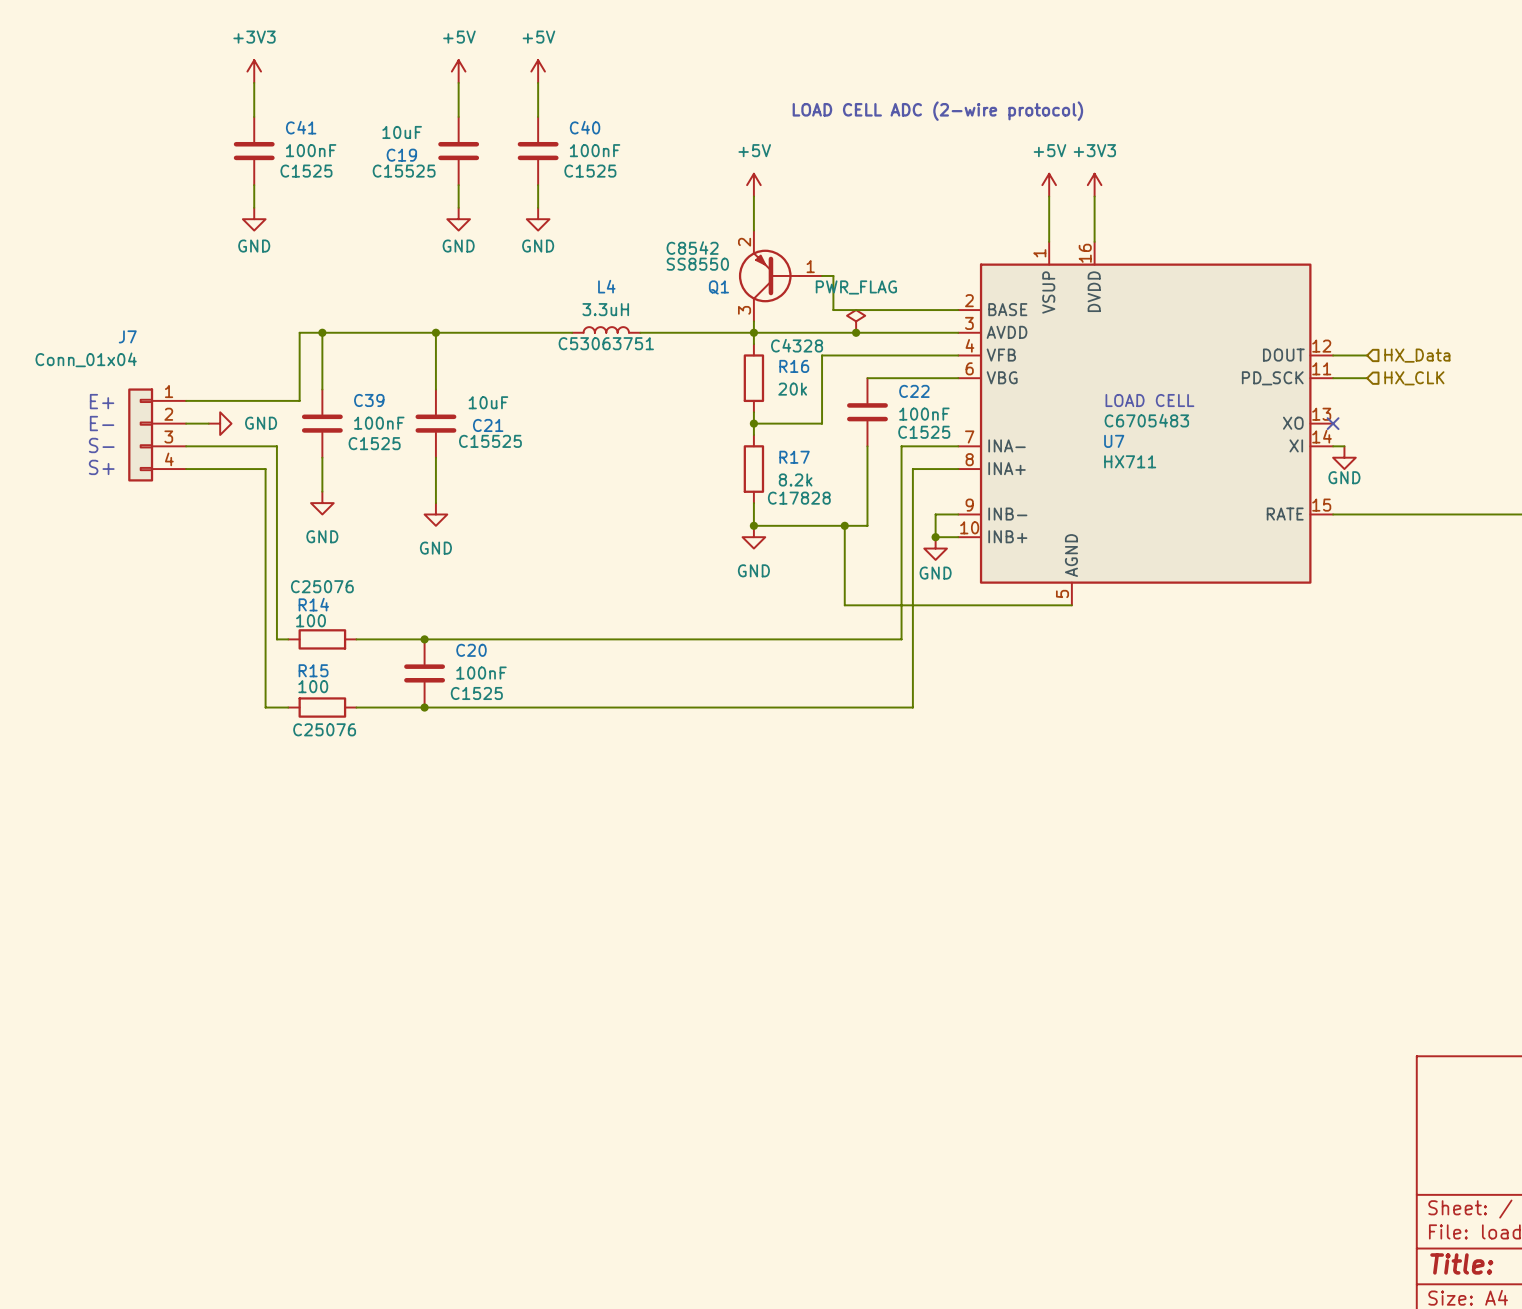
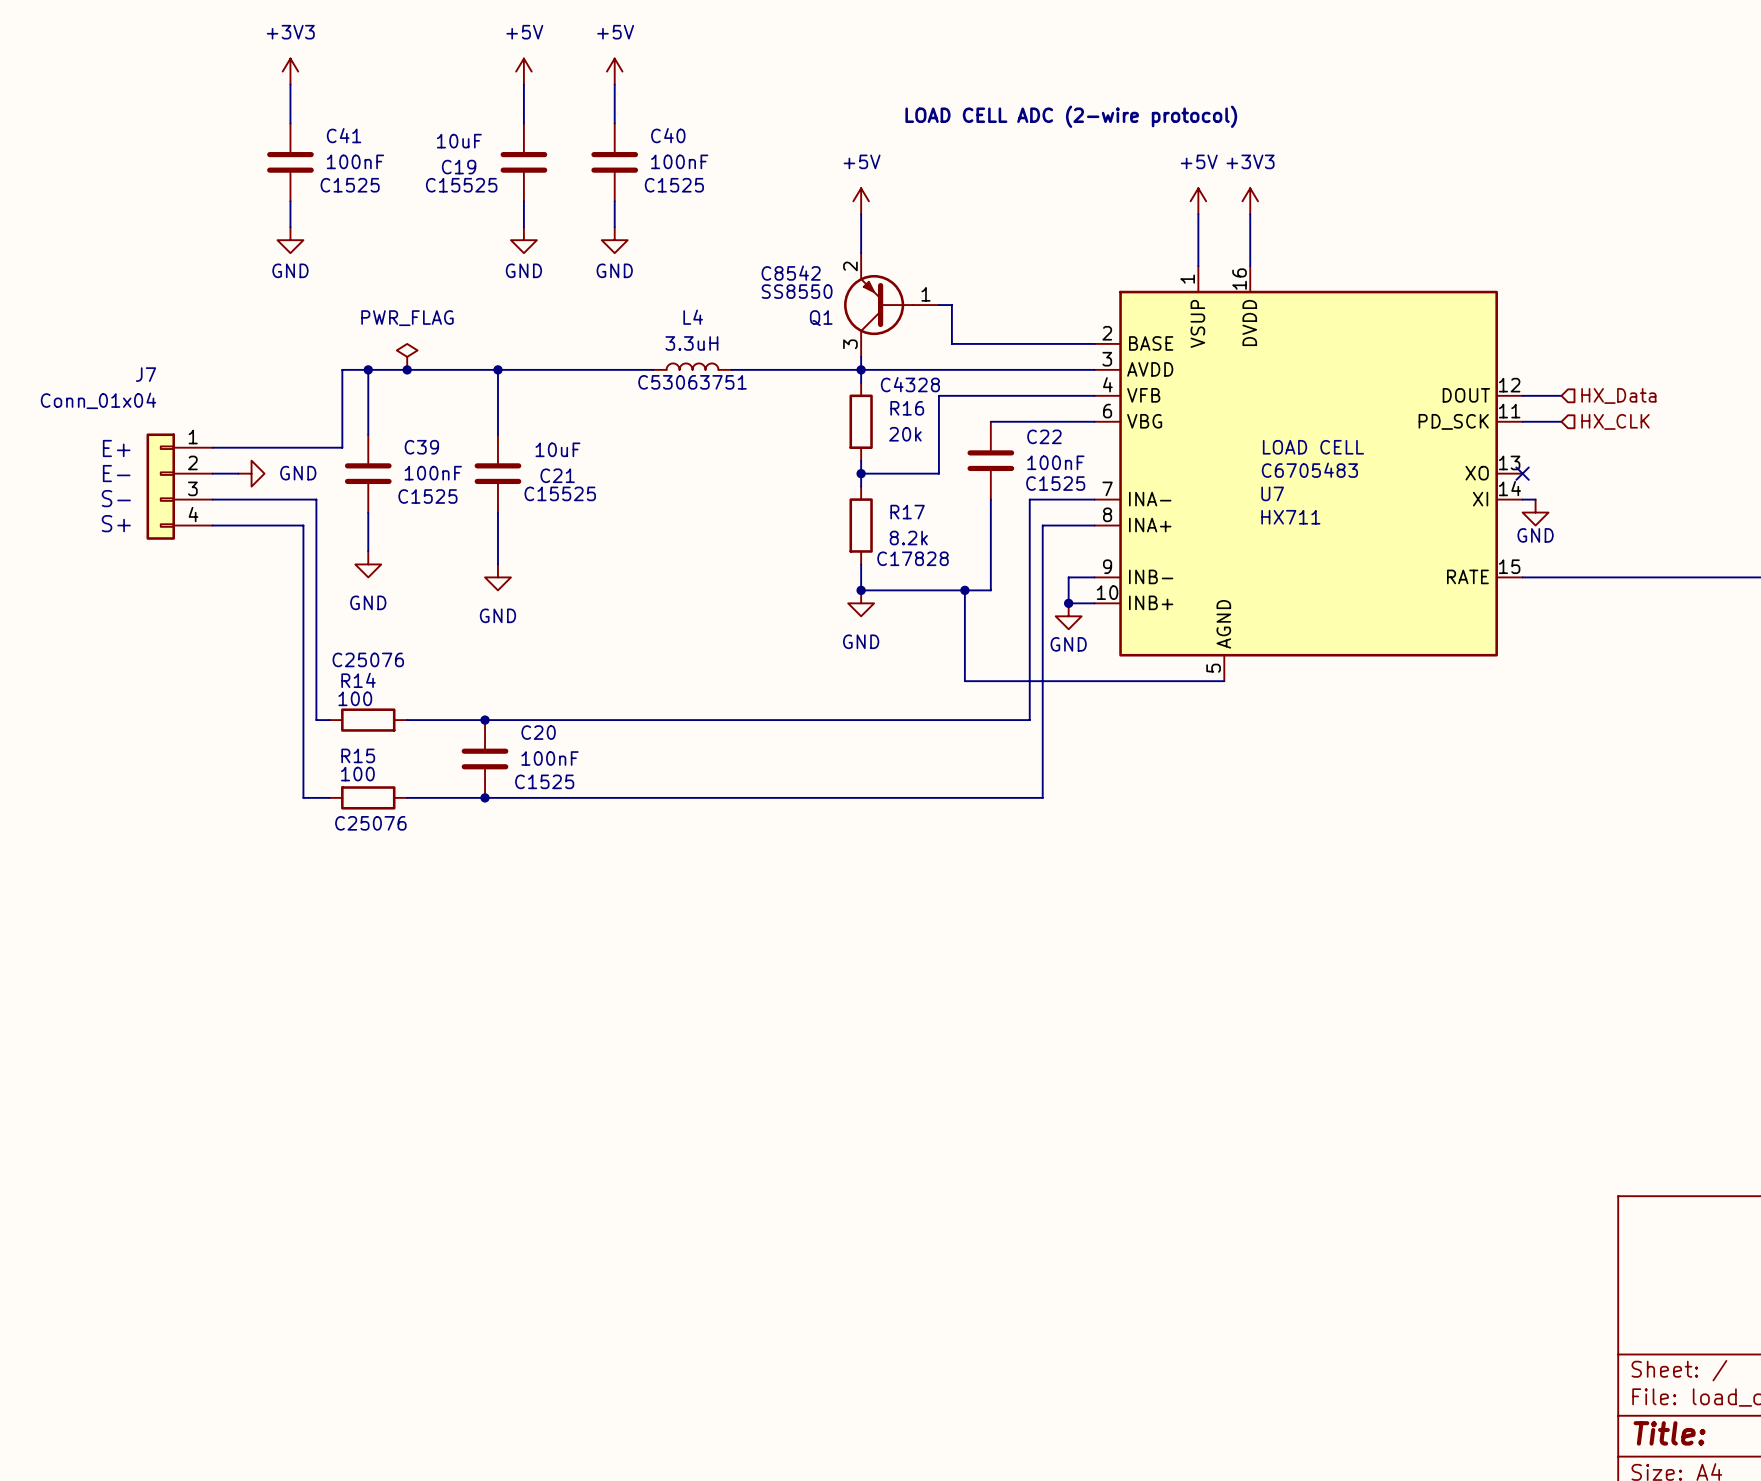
power symbol: none -> PWR_FLAG (407, 356)
power symbol: PWR_FLAG (856, 321) -> none
junction: none -> (407, 369)
junction: (856, 332) -> none

